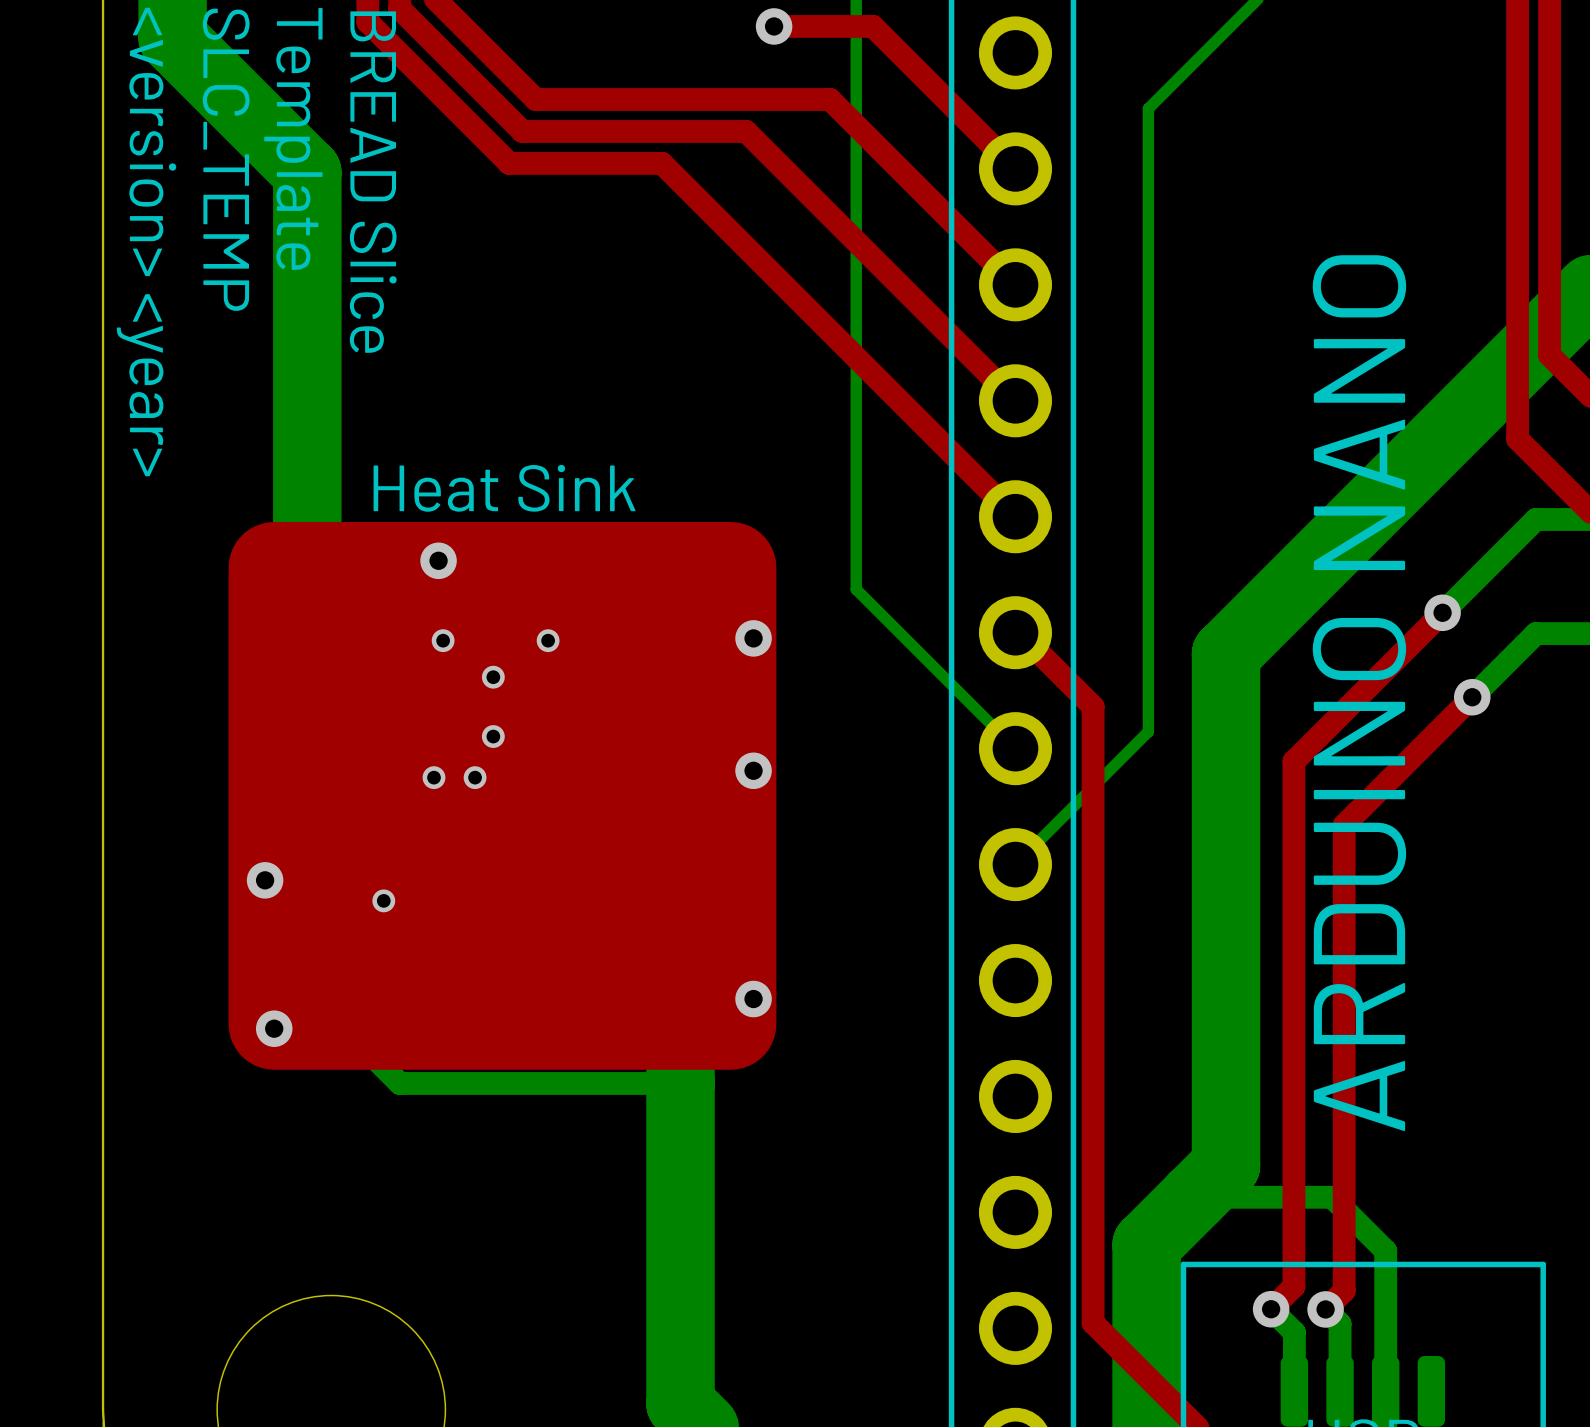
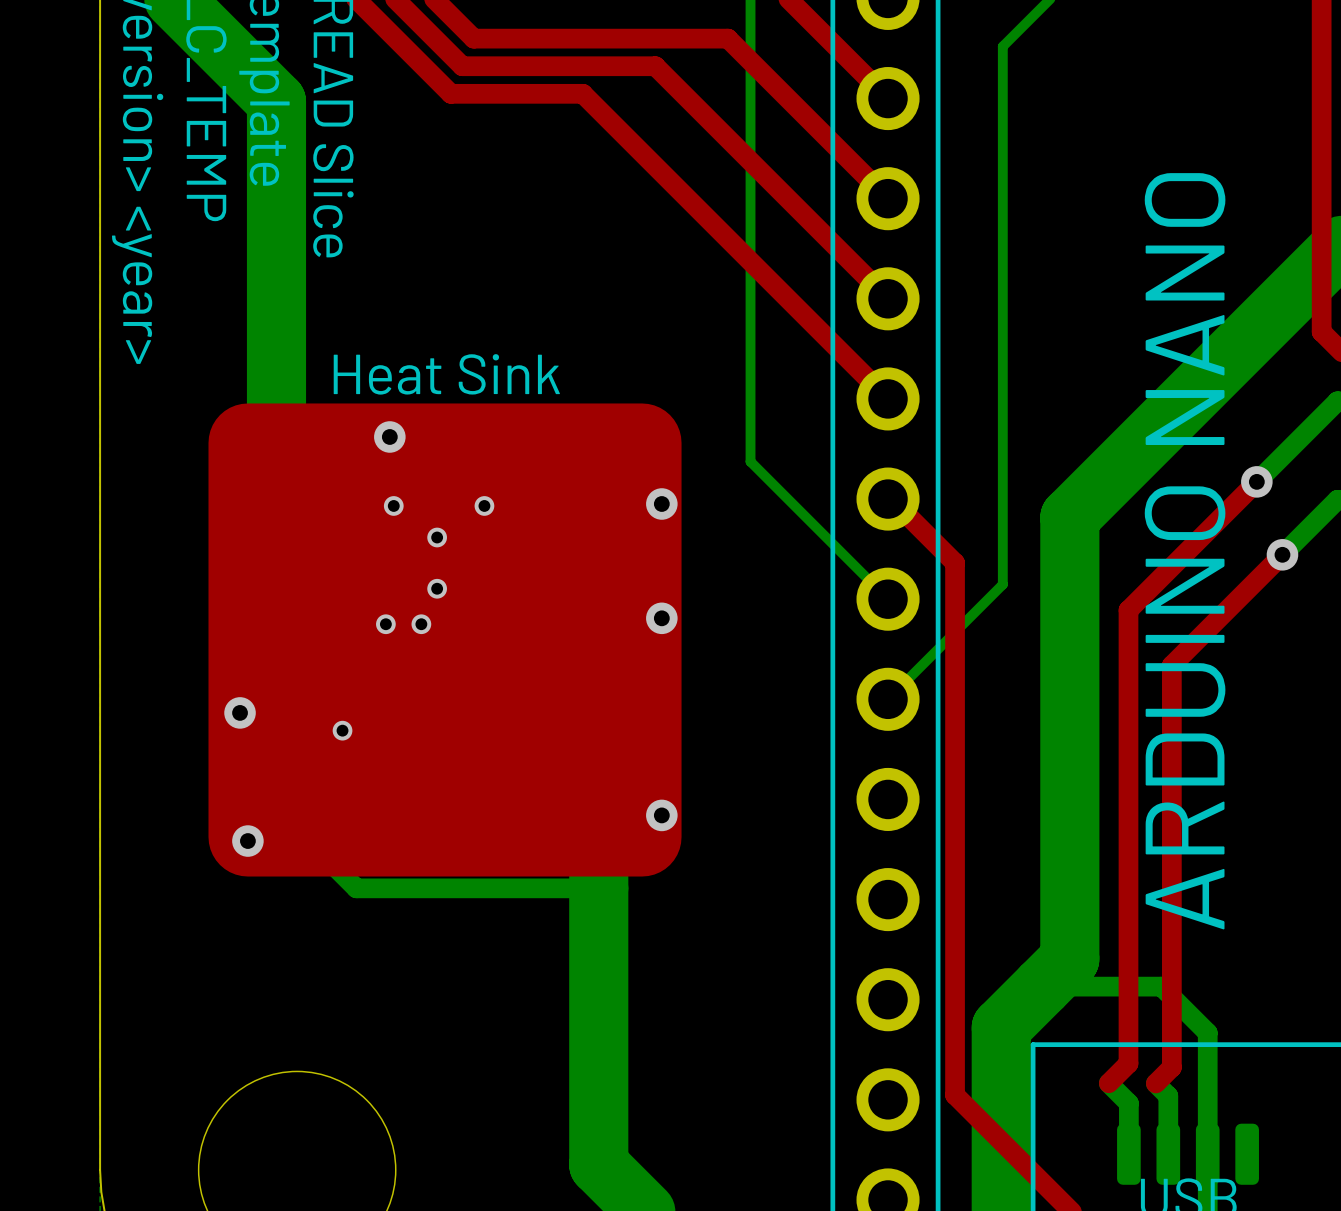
via: (1271, 1309) -> none
via: (1325, 1309) -> none

